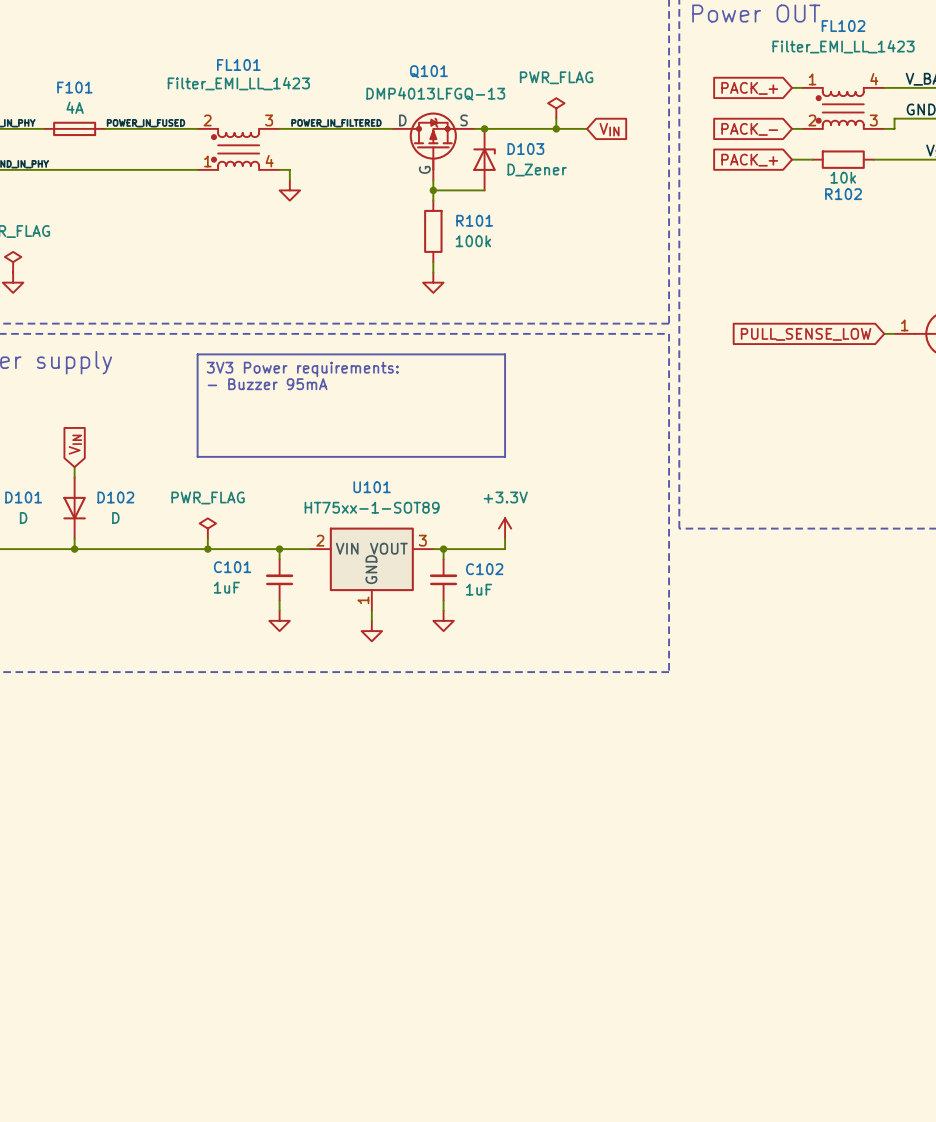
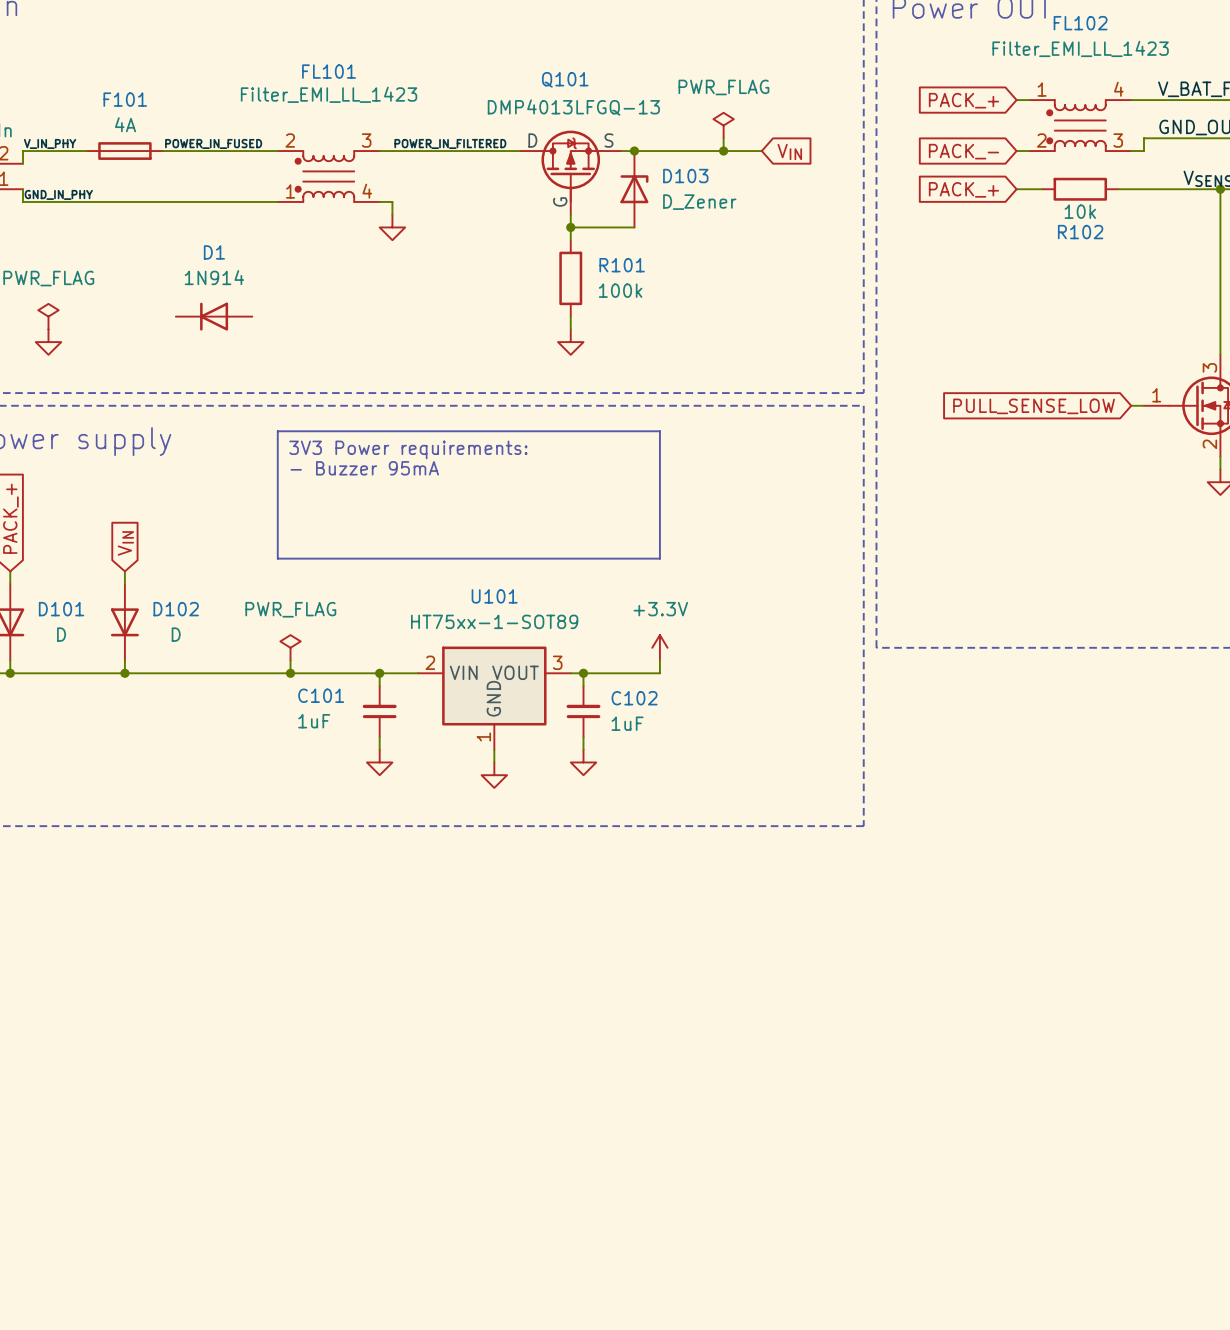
D1: none -> 1N914 (214, 316)

